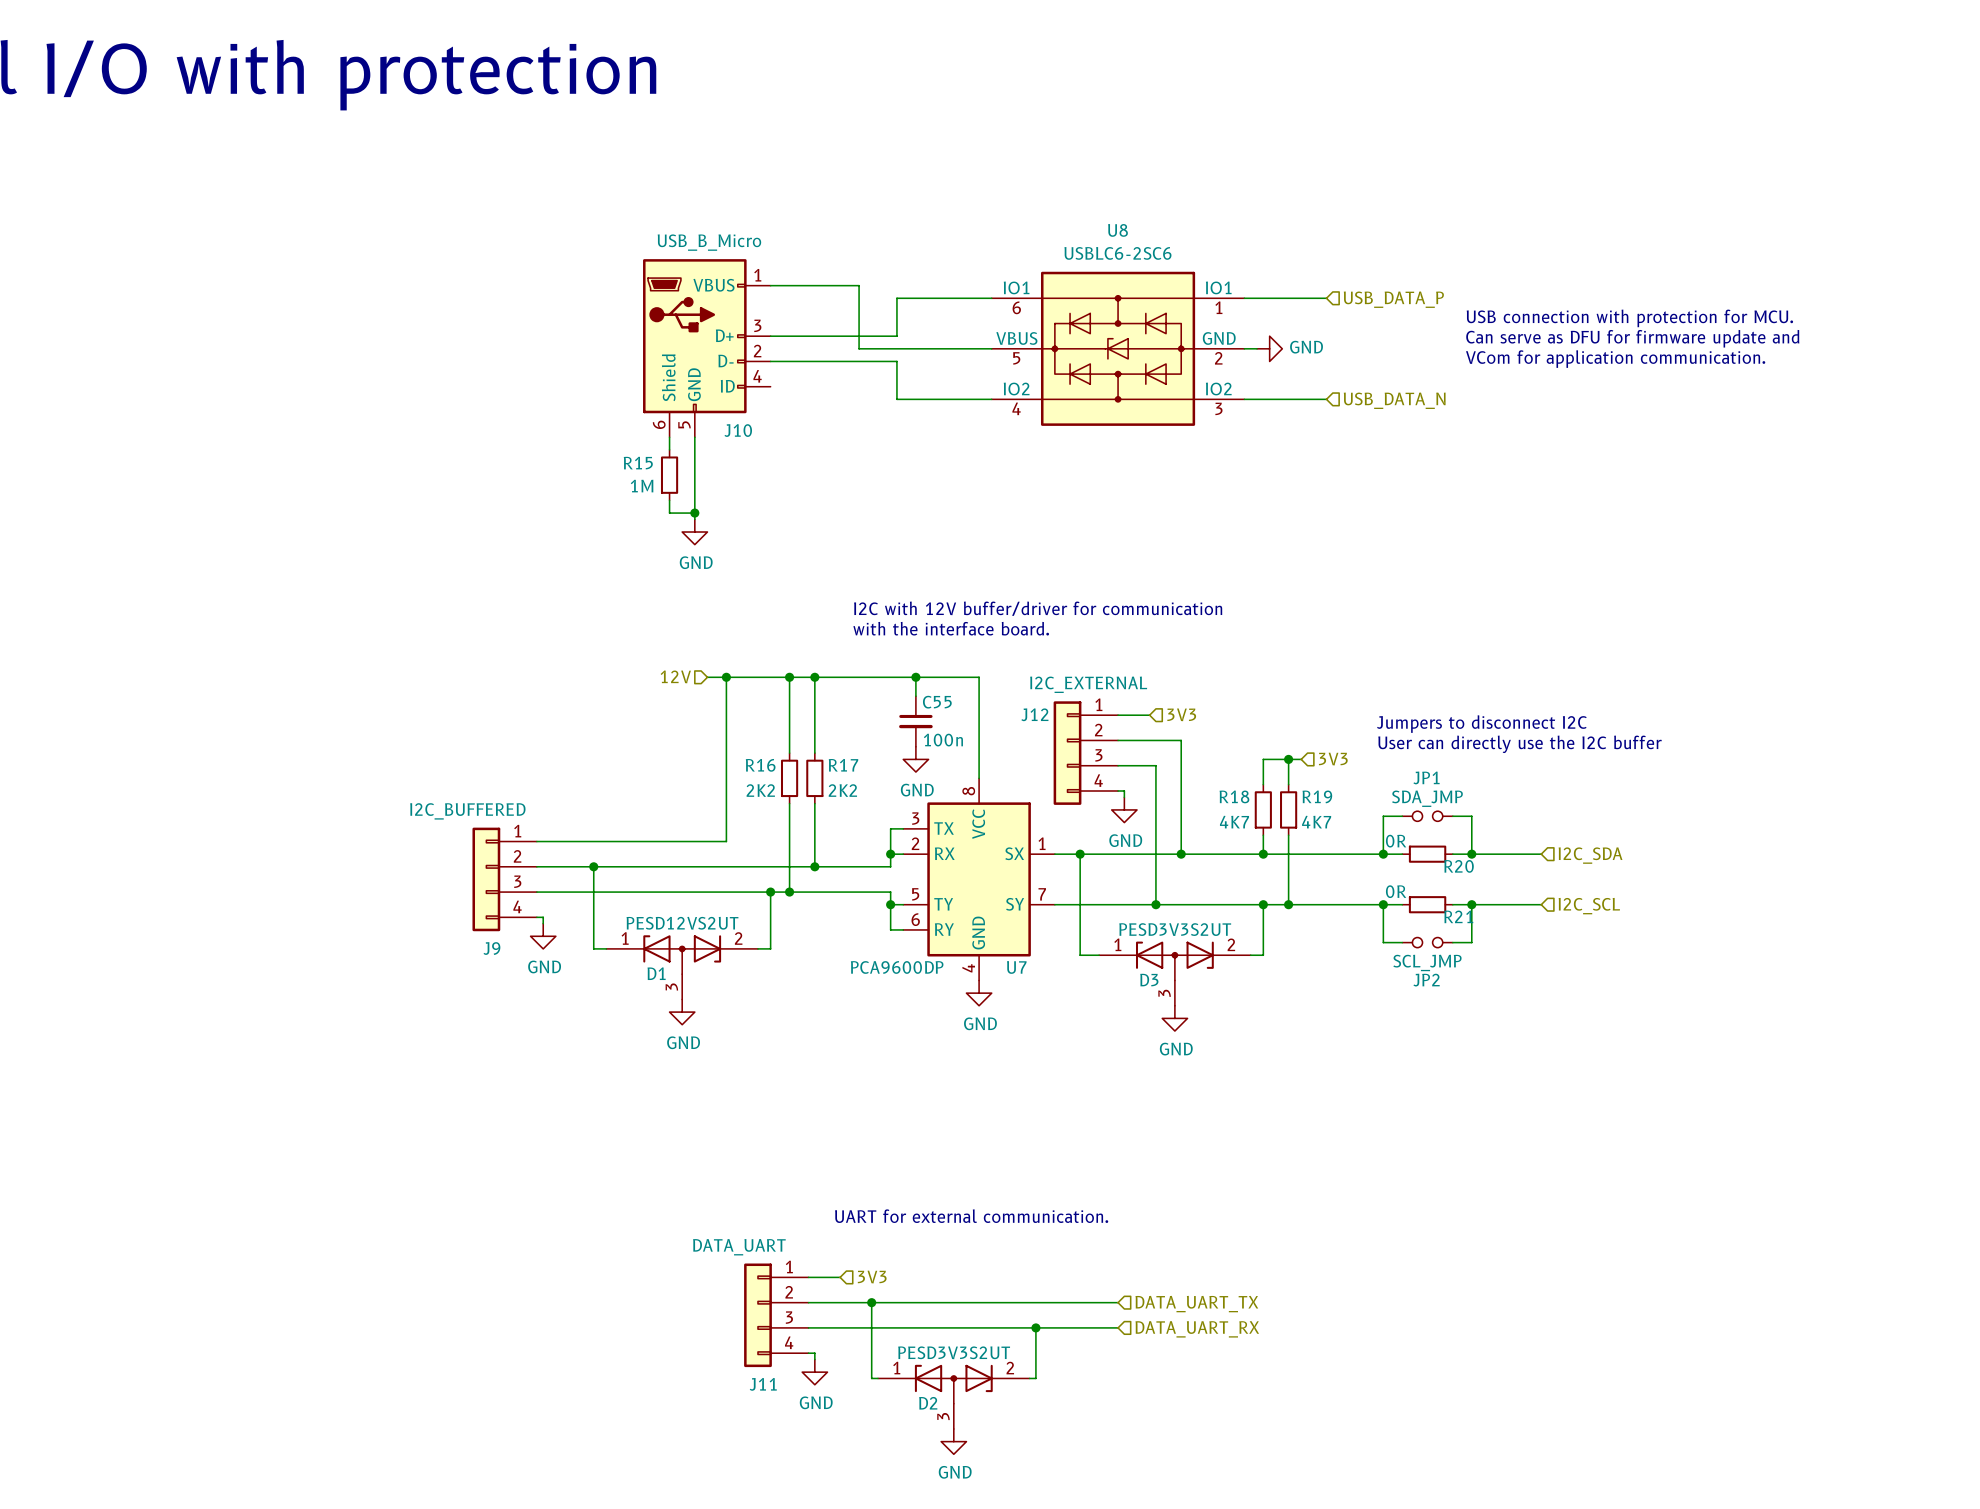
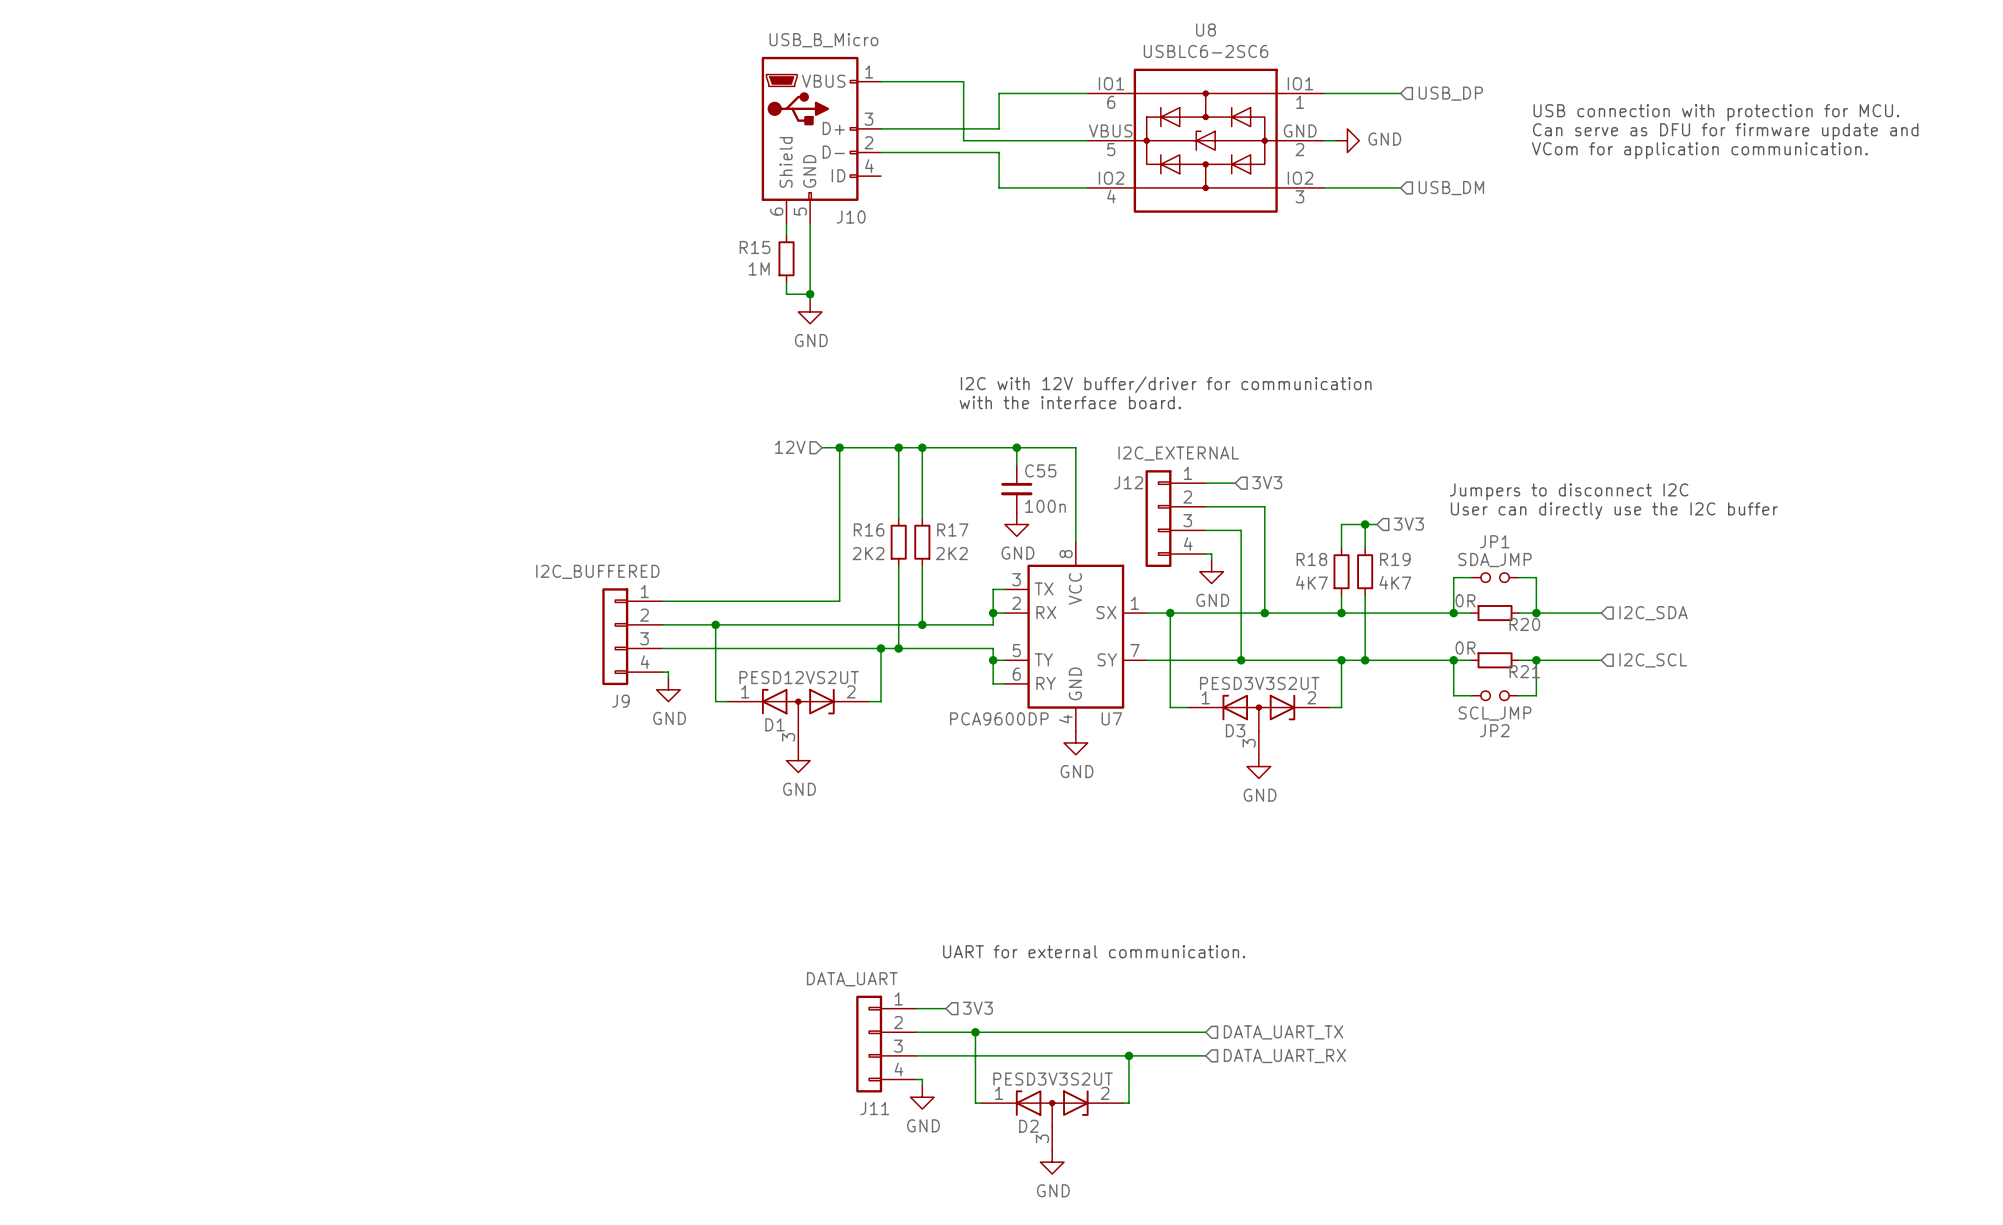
hierarchical label: USB_DATA_P (1393, 299) -> USB_DP (1450, 93)
hierarchical label: USB_DATA_N (1394, 400) -> USB_DM (1451, 188)

